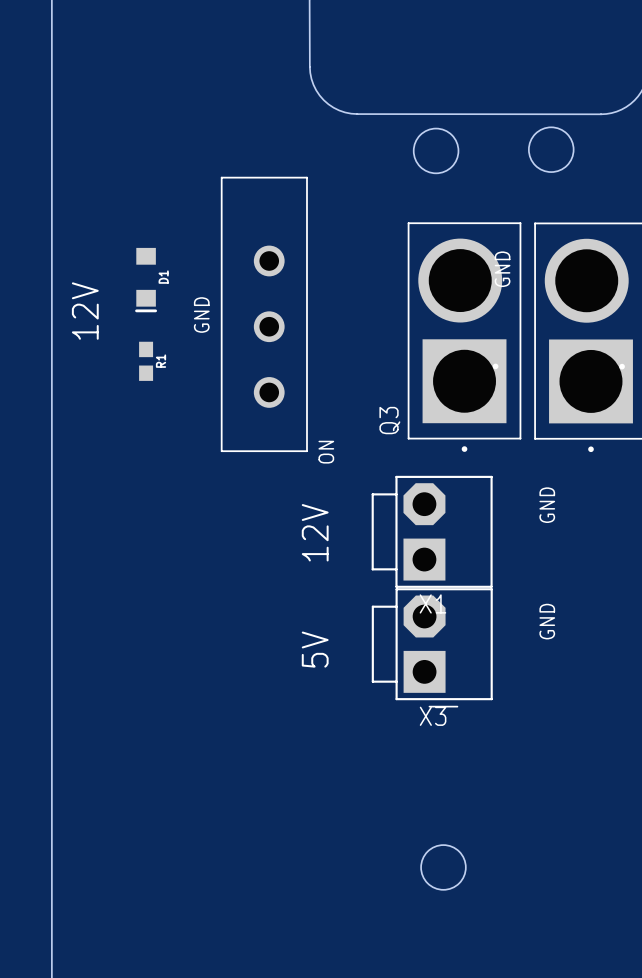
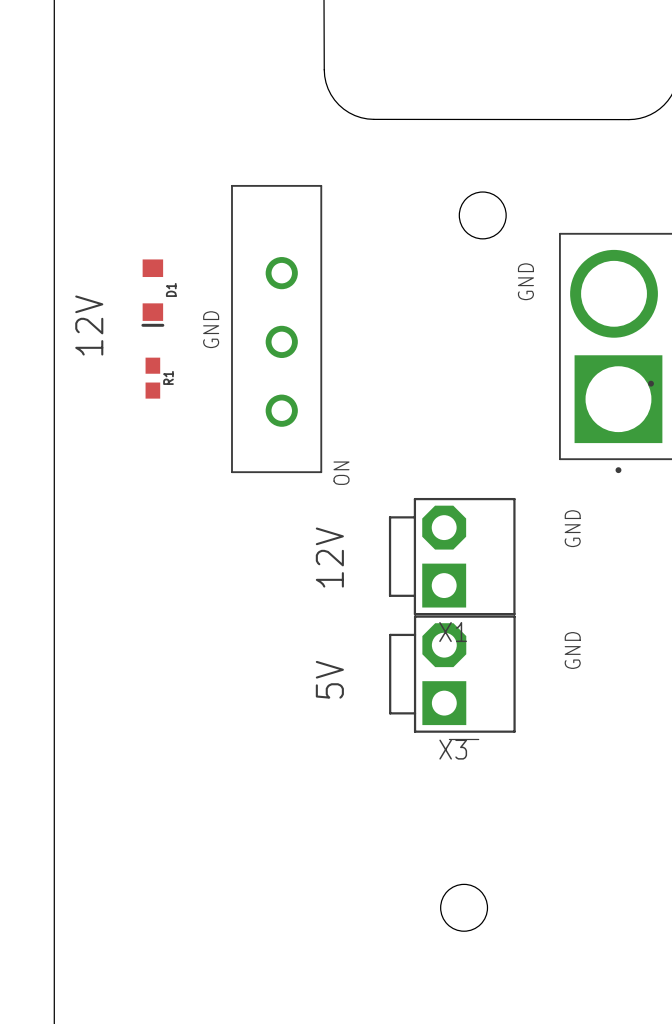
round board edge: [528, 127, 574, 173] -> none
round board edge: [413, 128, 459, 174] -> none
round board edge: none -> [459, 192, 507, 239]
Q3: (464, 337) -> none

